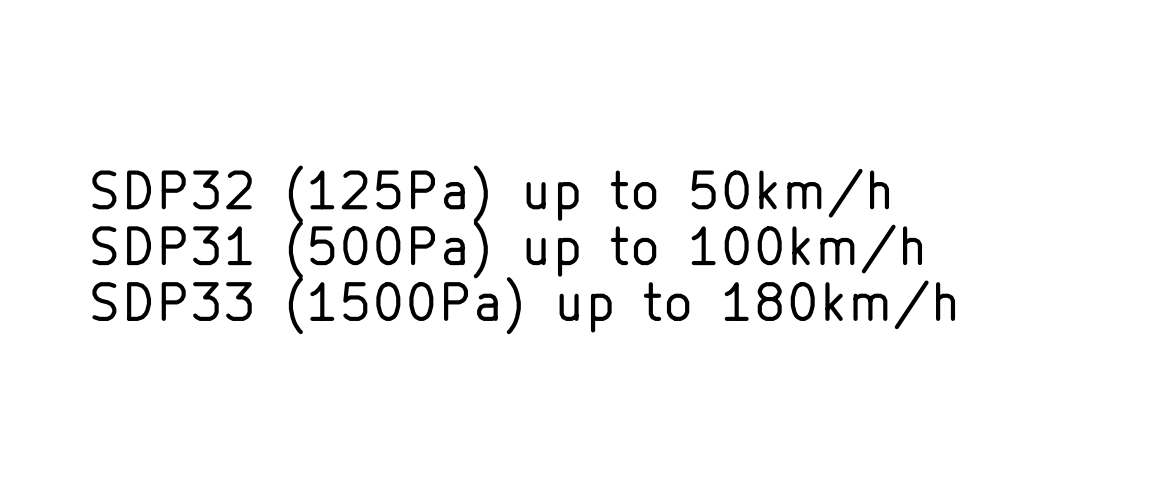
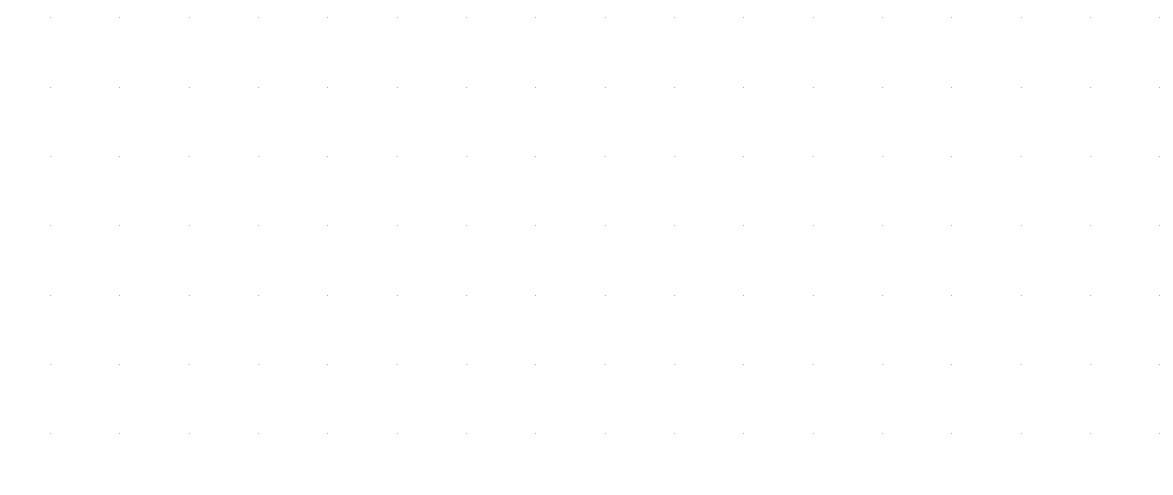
text: SDP32 (125Pa) up to 50km/h (490, 194) -> none
text: SDP31 (500Pa) up to 100km/h (507, 249) -> none
text: SDP33 (1500Pa) up to 180km/h (523, 305) -> none

